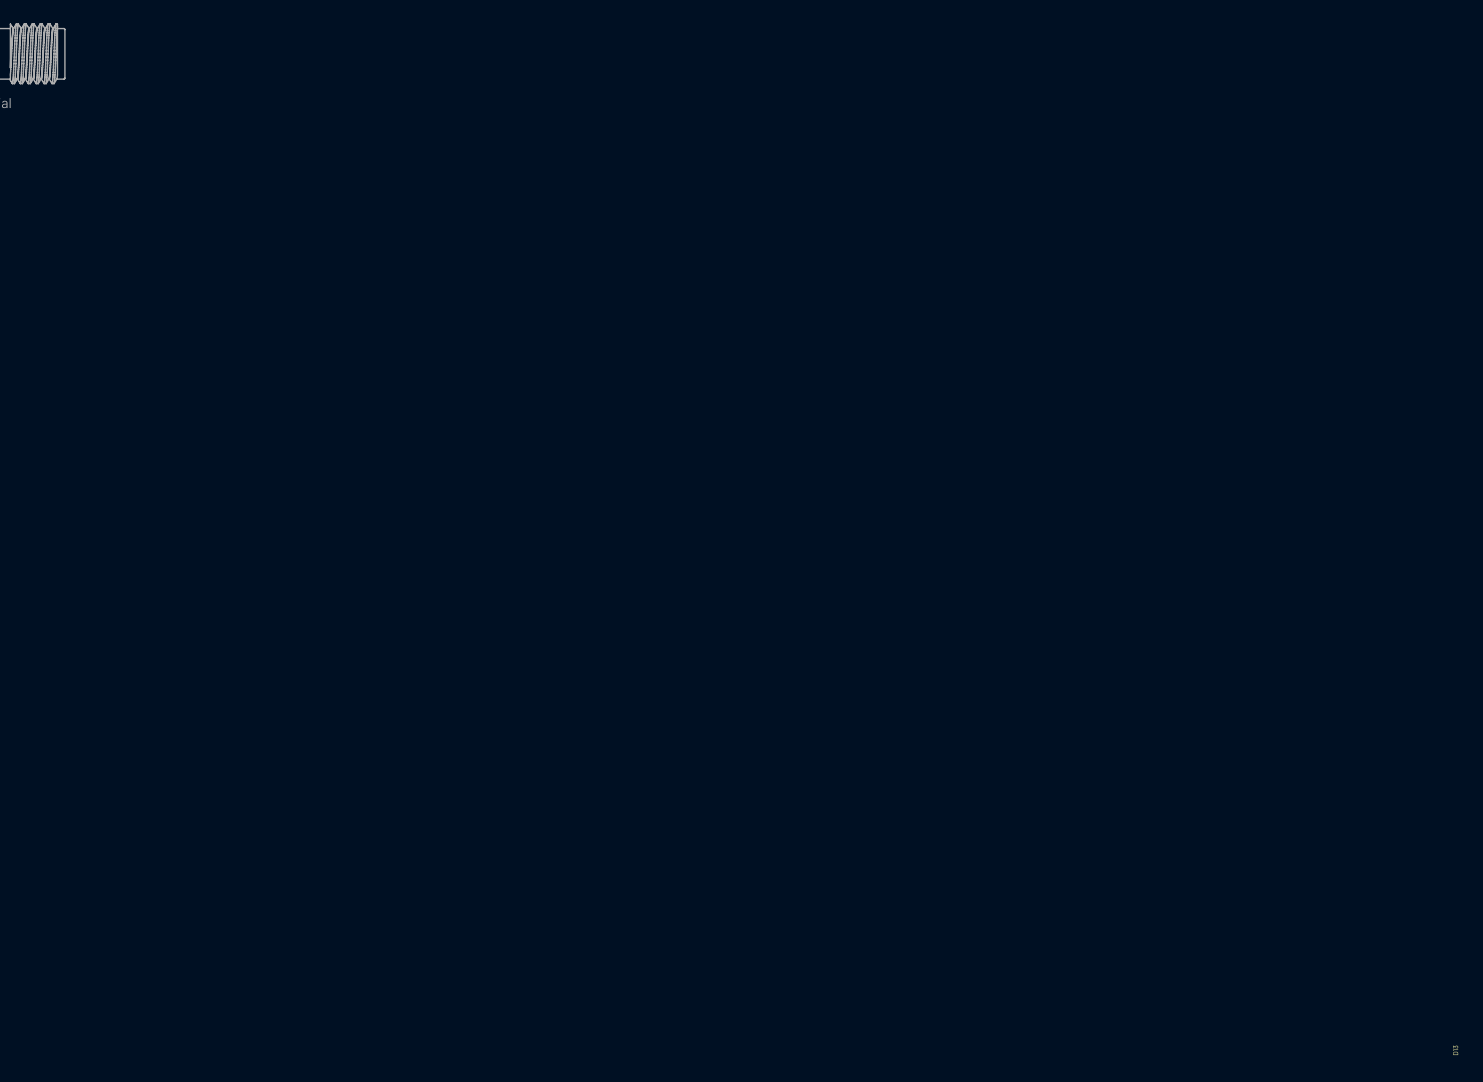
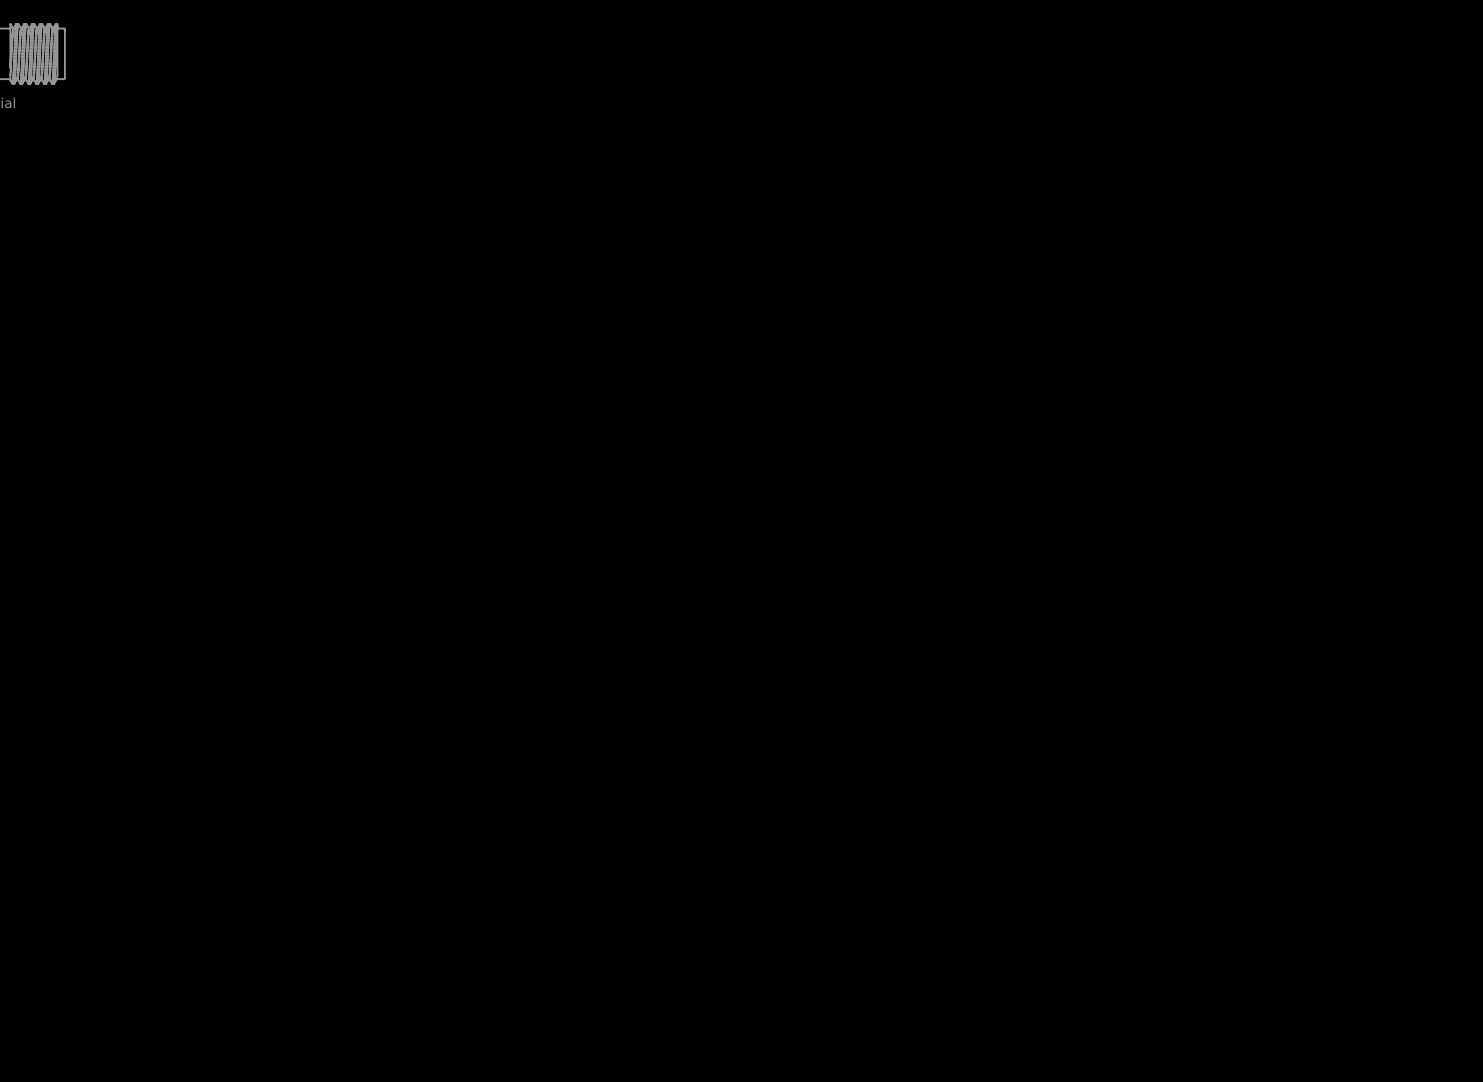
drawing: [1453, 1045, 1459, 1056] -> none

